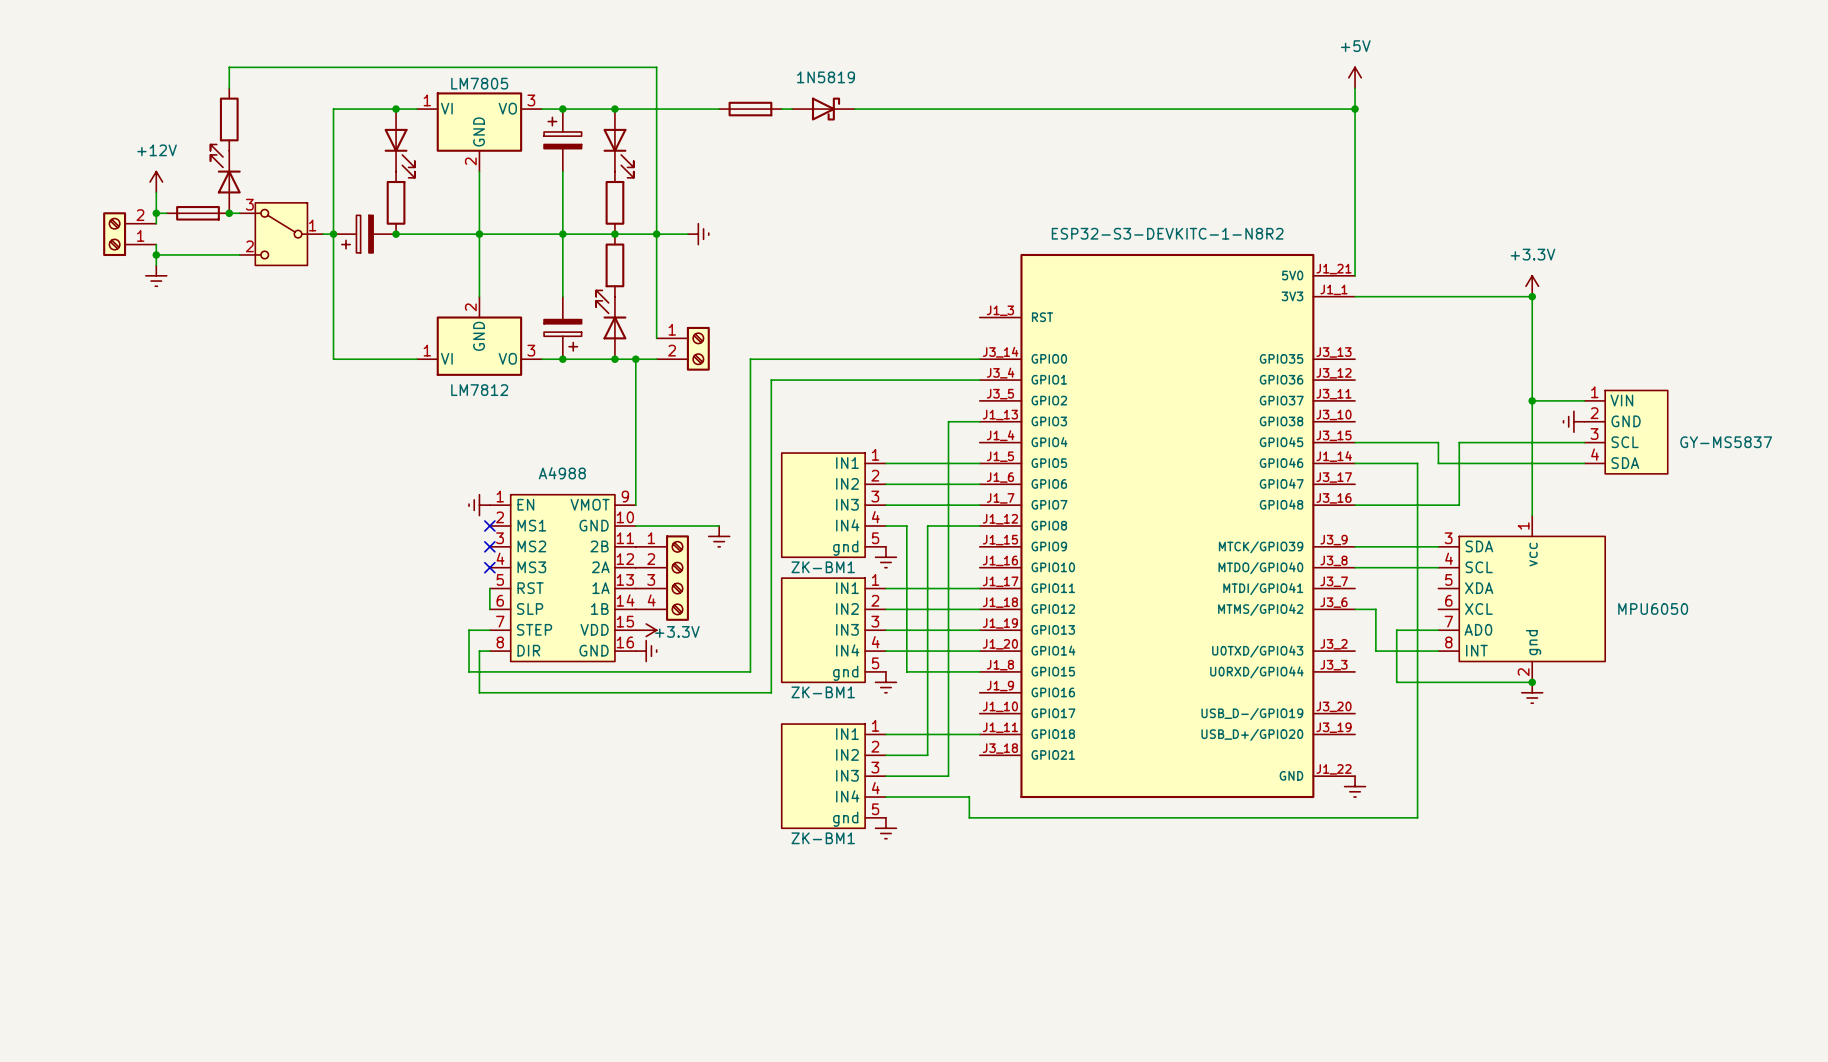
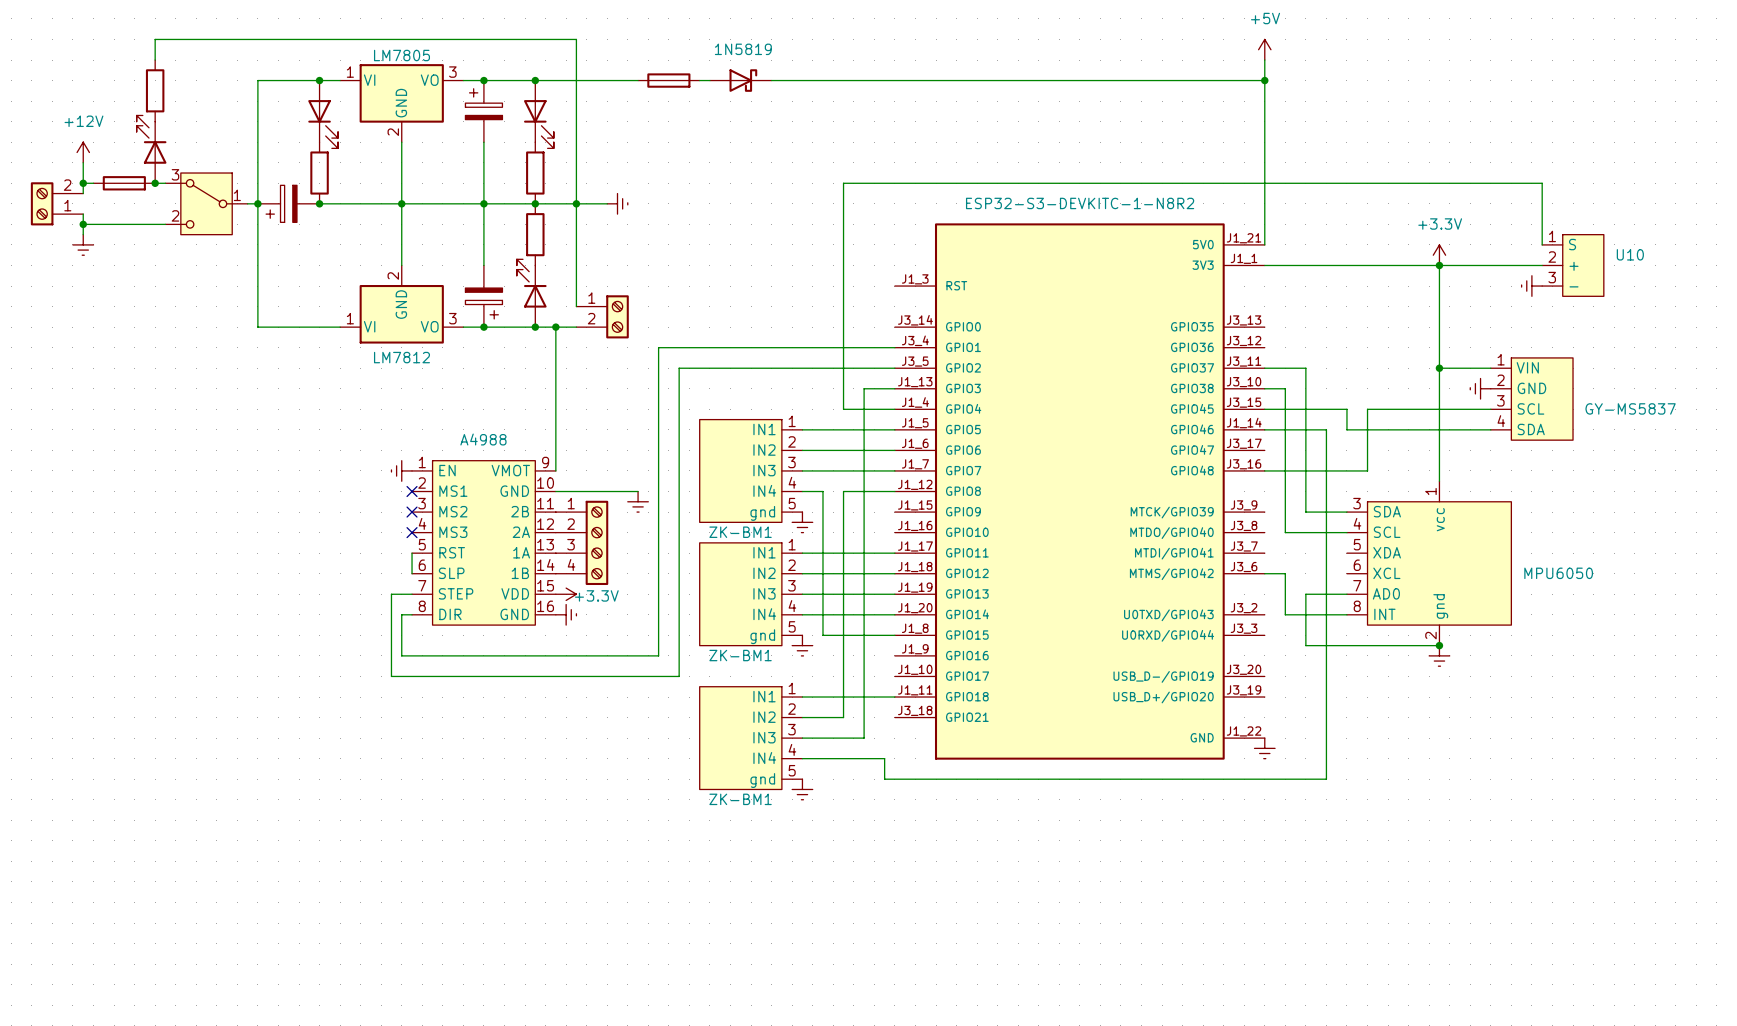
wire: none -> (1542, 244) (1542, 183) (843, 183) (843, 409) (894, 409)
wire: none -> (1439, 265) (1542, 265)
U10: none -> (1573, 265)
power symbol: none -> (1531, 286)
wire: (979, 359) (750, 359) (750, 671) (469, 671) -> (894, 368) (679, 368) (679, 676) (391, 676) (391, 635)
wire: (771, 380) (771, 692) (740, 692) -> (689, 347) (658, 347) (658, 655)
wire: (1355, 546) (1396, 546) -> (1264, 368) (1305, 368) (1305, 512)
wire: (1355, 567) (1375, 567) -> (1264, 388) (1285, 388) (1285, 532)

